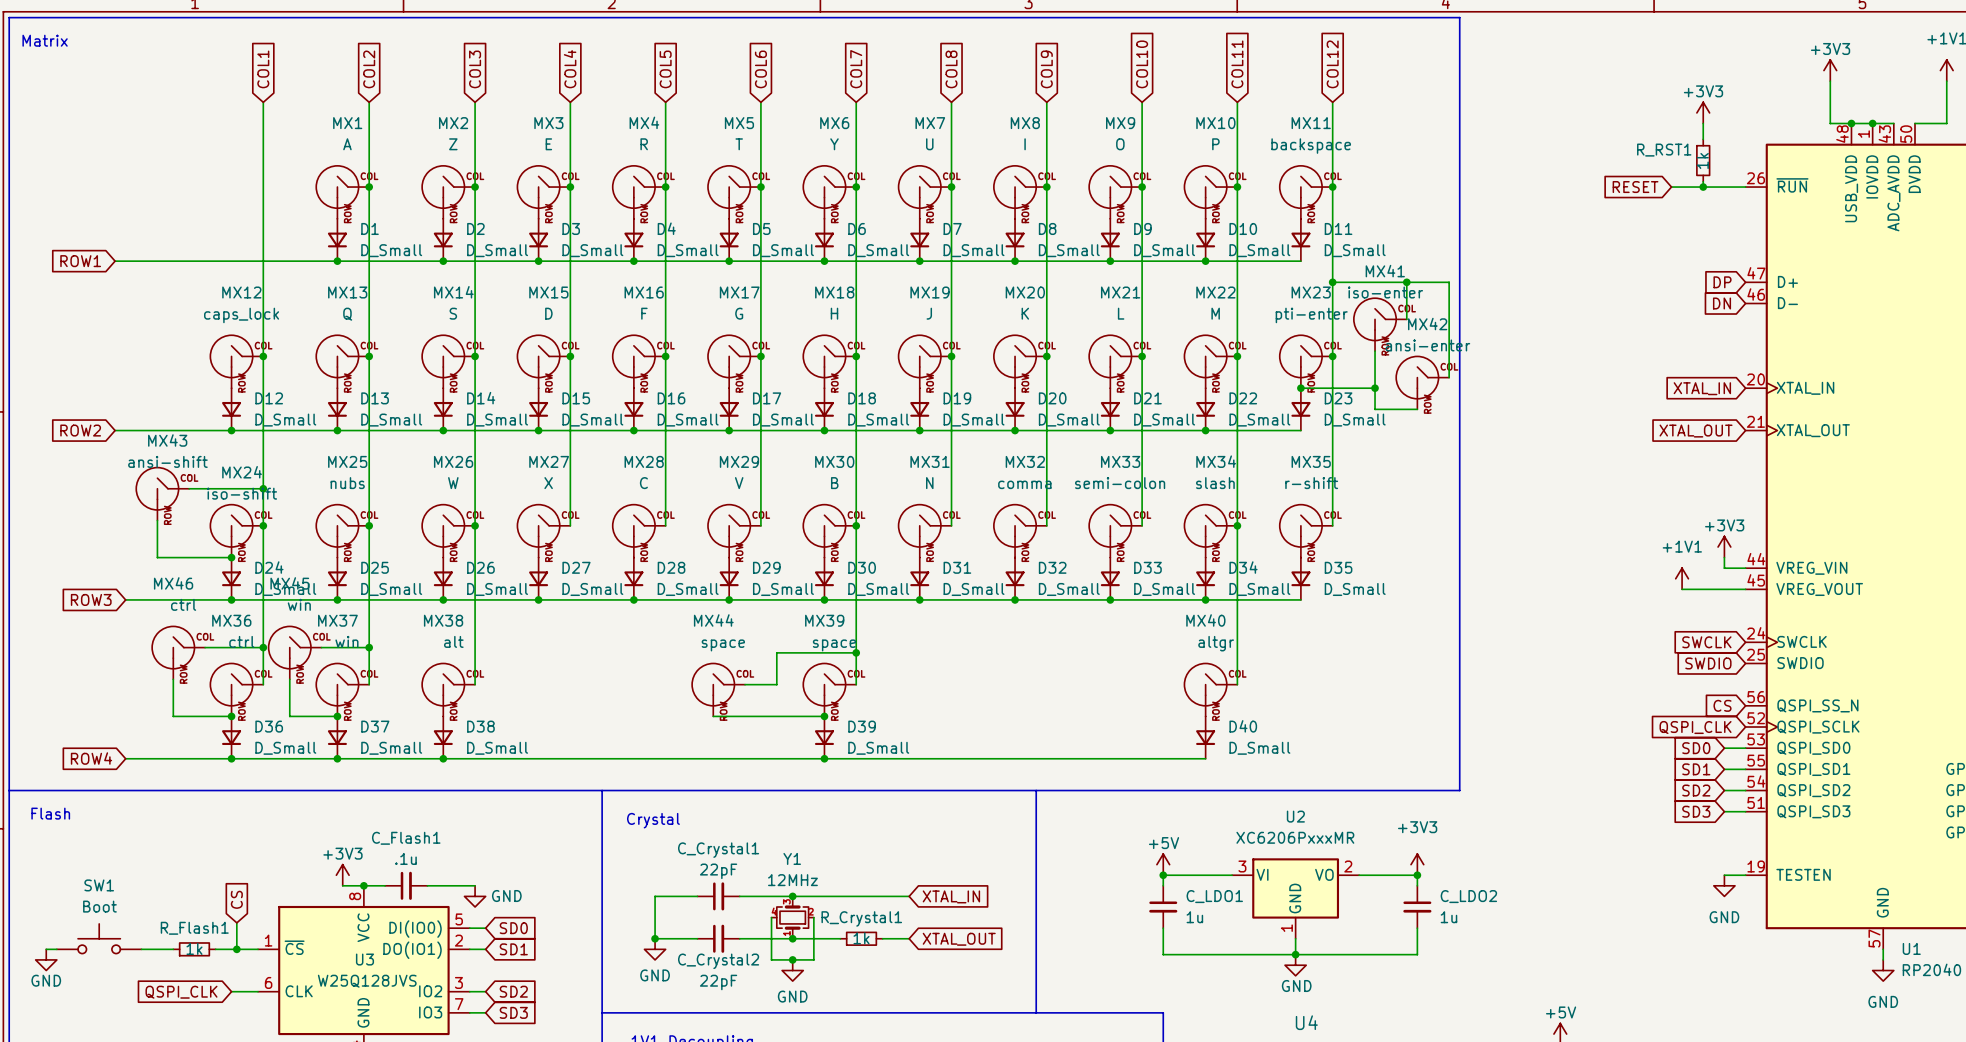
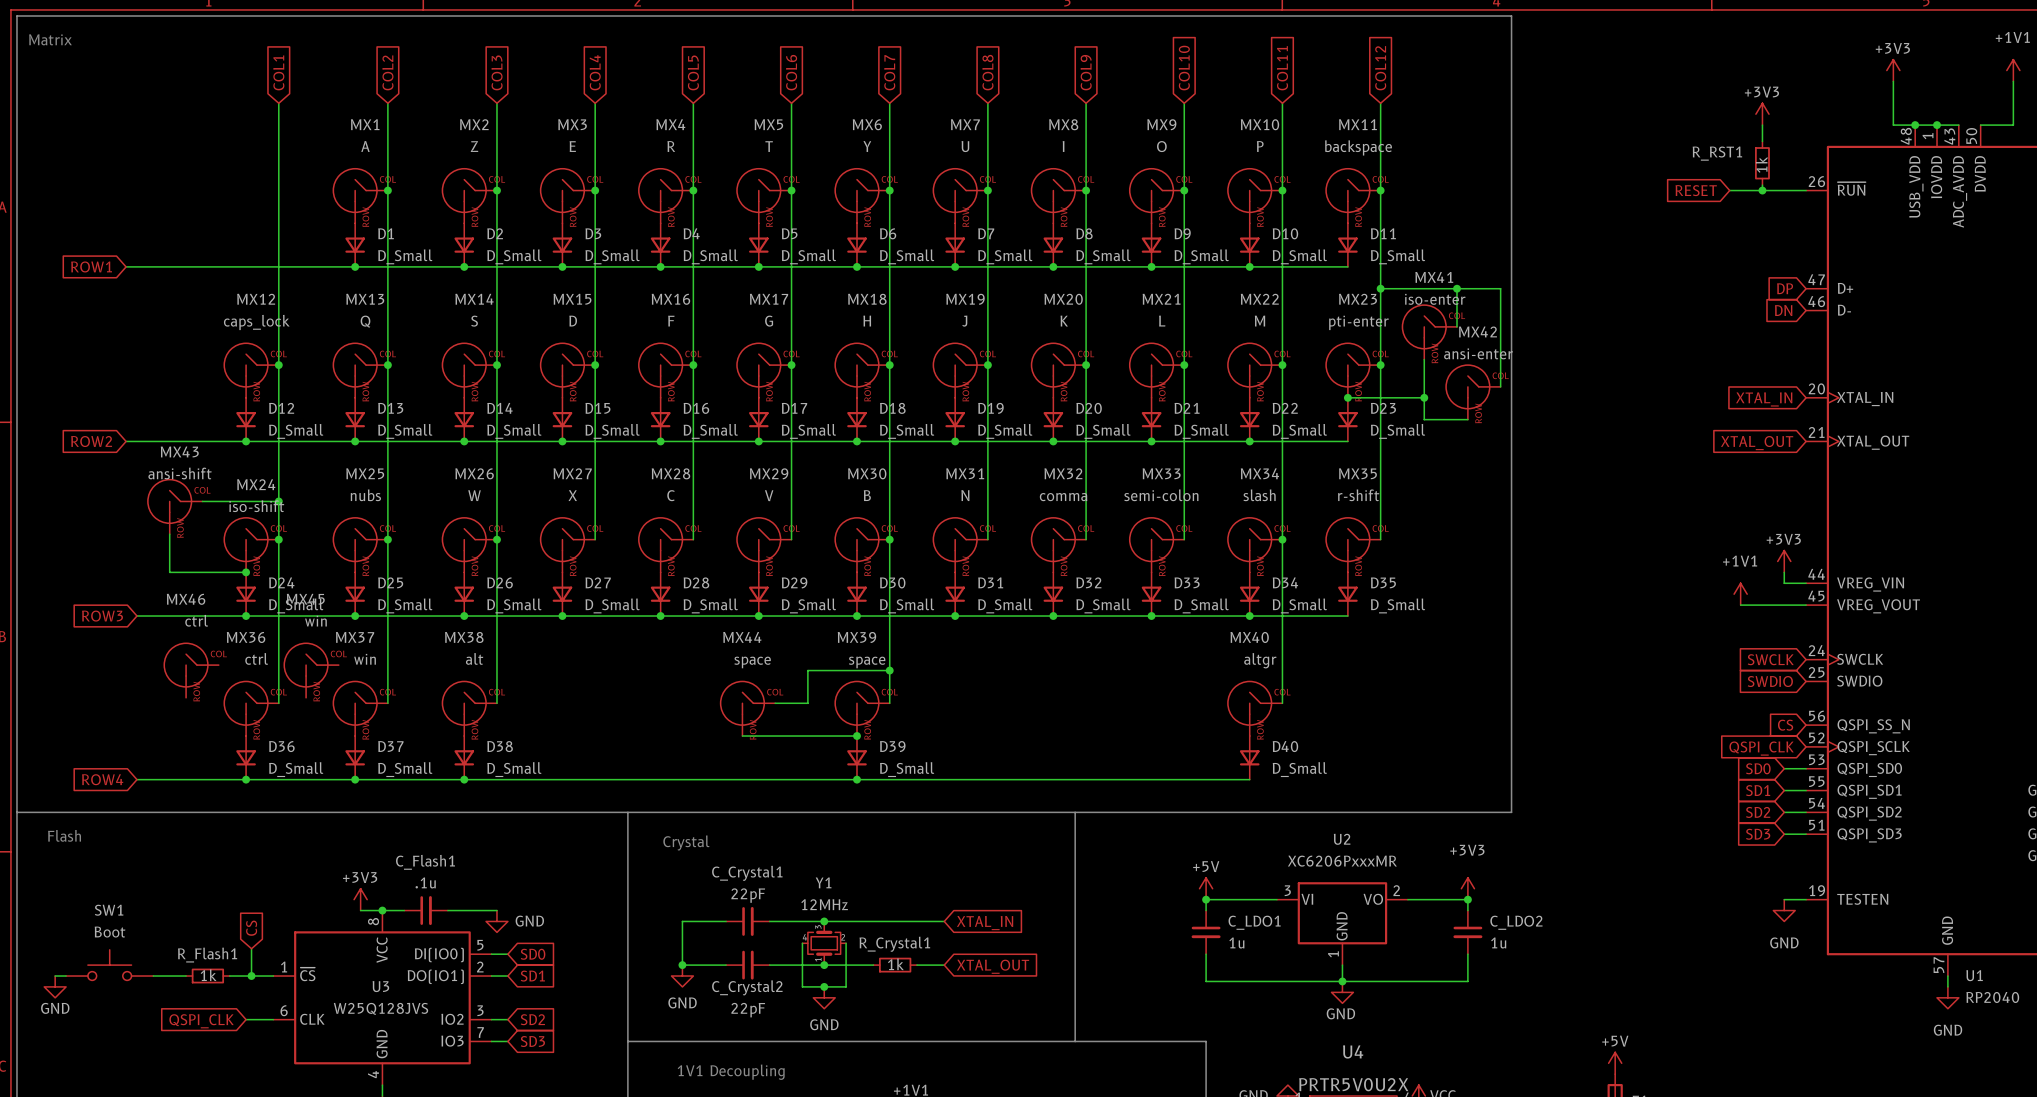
wire: (205, 647) (263, 647) -> none
junction: (263, 647) -> none
wire: (321, 647) (369, 647) -> none
junction: (369, 647) -> none
wire: (173, 679) (173, 716) (231, 716) -> none
wire: (289, 679) (289, 716) (337, 716) -> none
junction: (231, 716) -> none
junction: (337, 716) -> none

